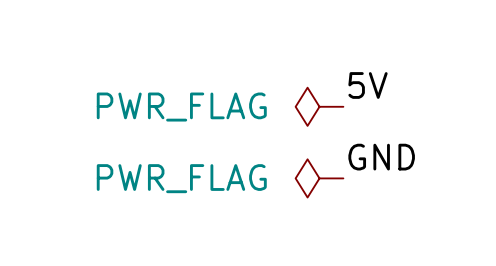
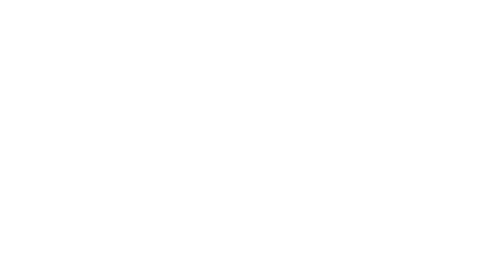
label: 5V (368, 85) -> none
power symbol: PWR_FLAG (319, 106) -> none
label: GND (381, 157) -> none
power symbol: PWR_FLAG (319, 178) -> none

